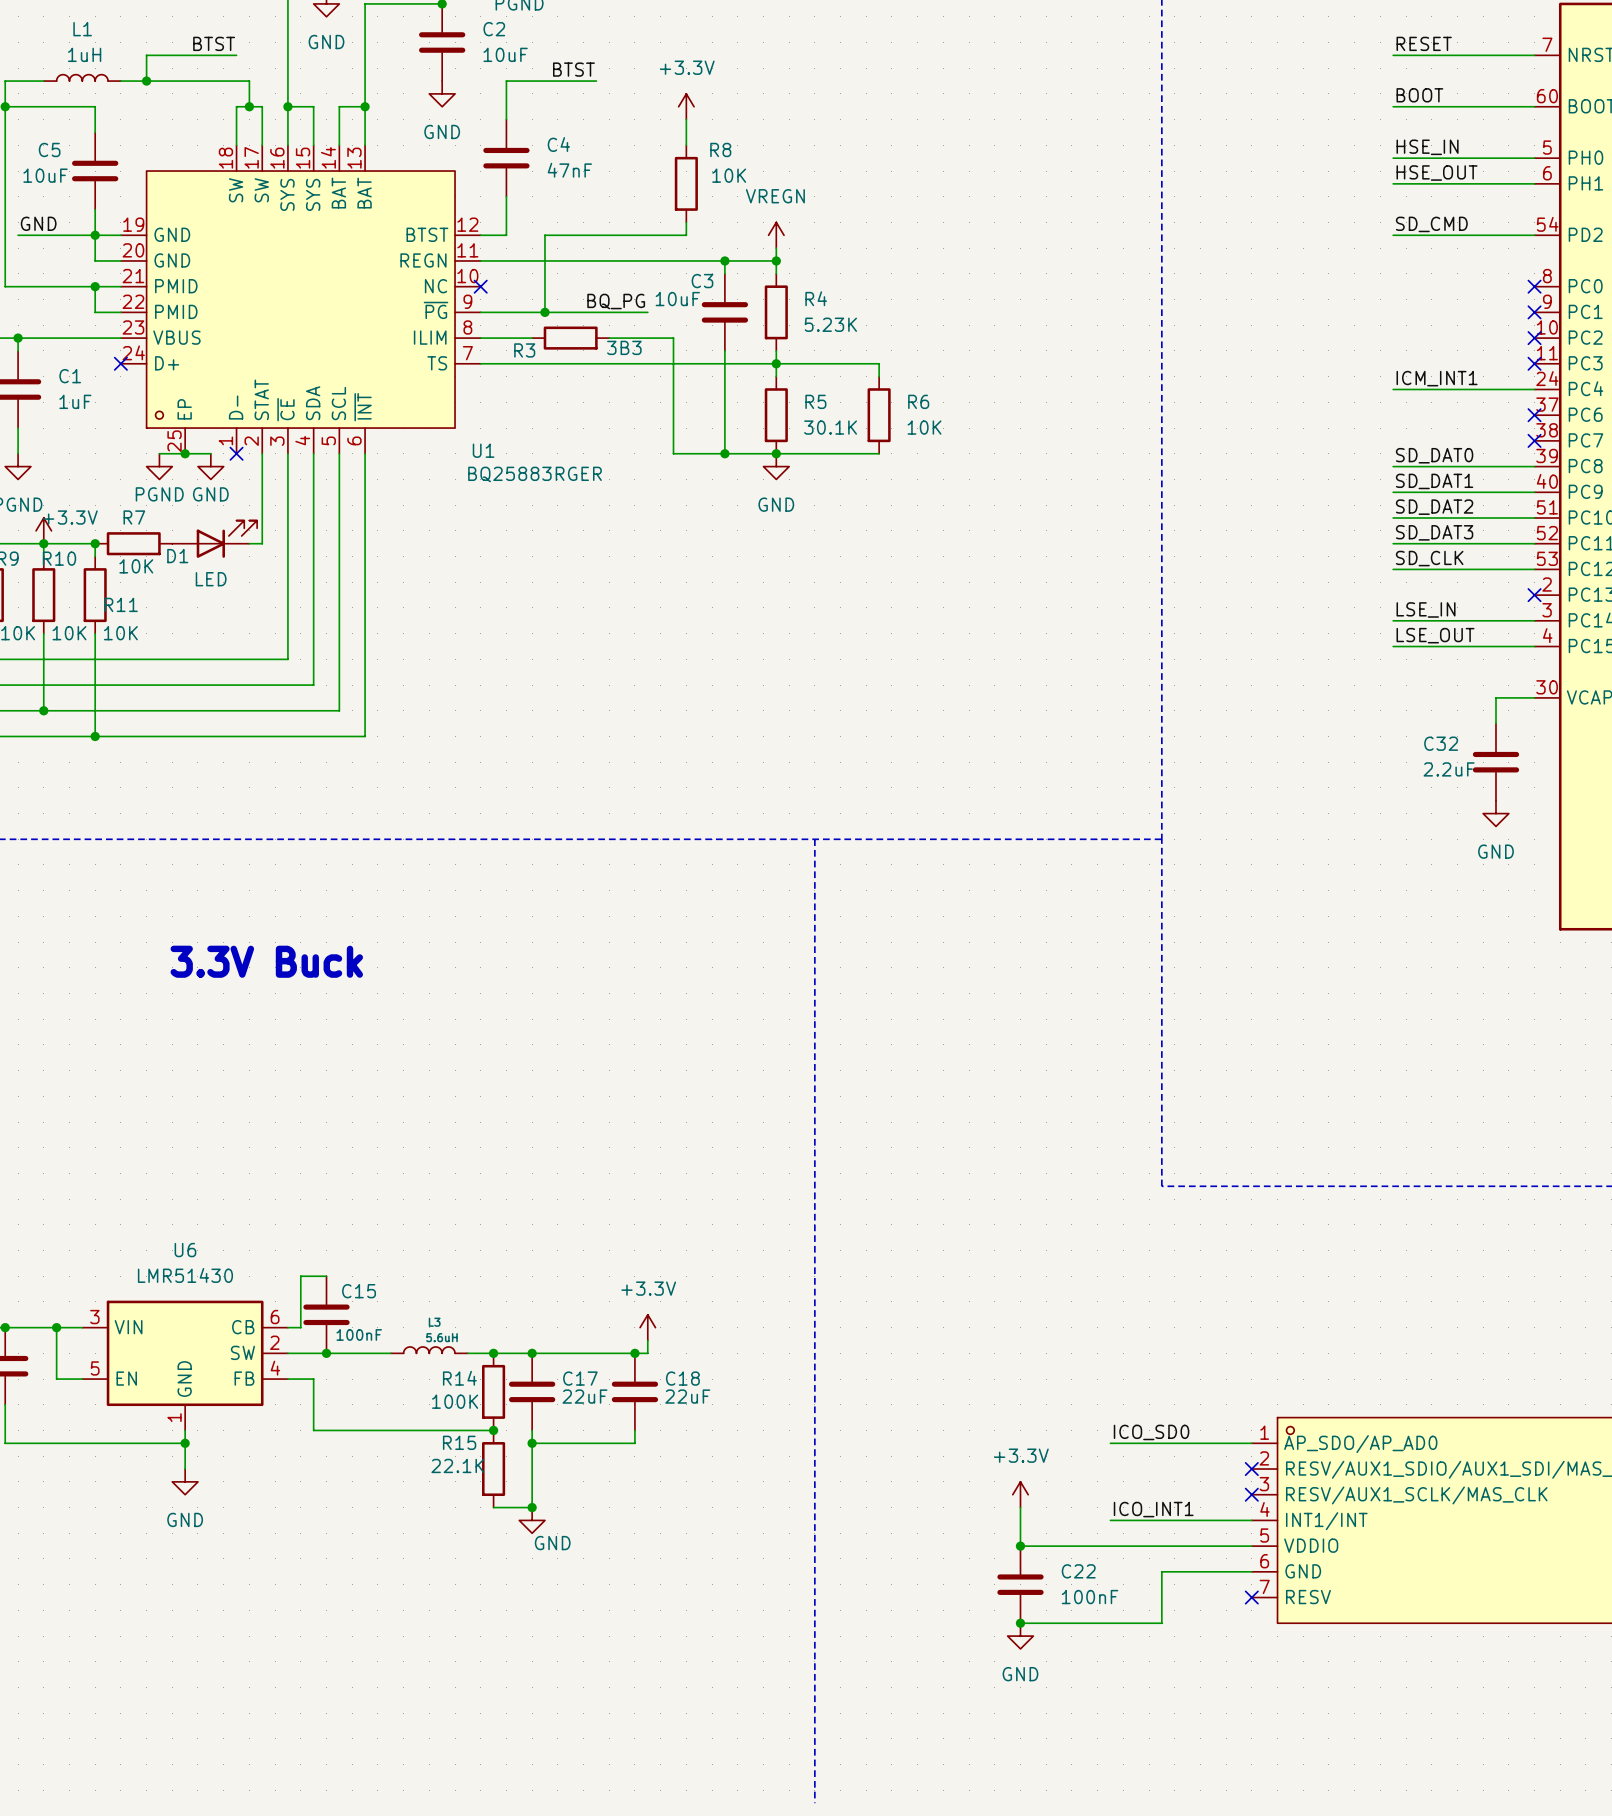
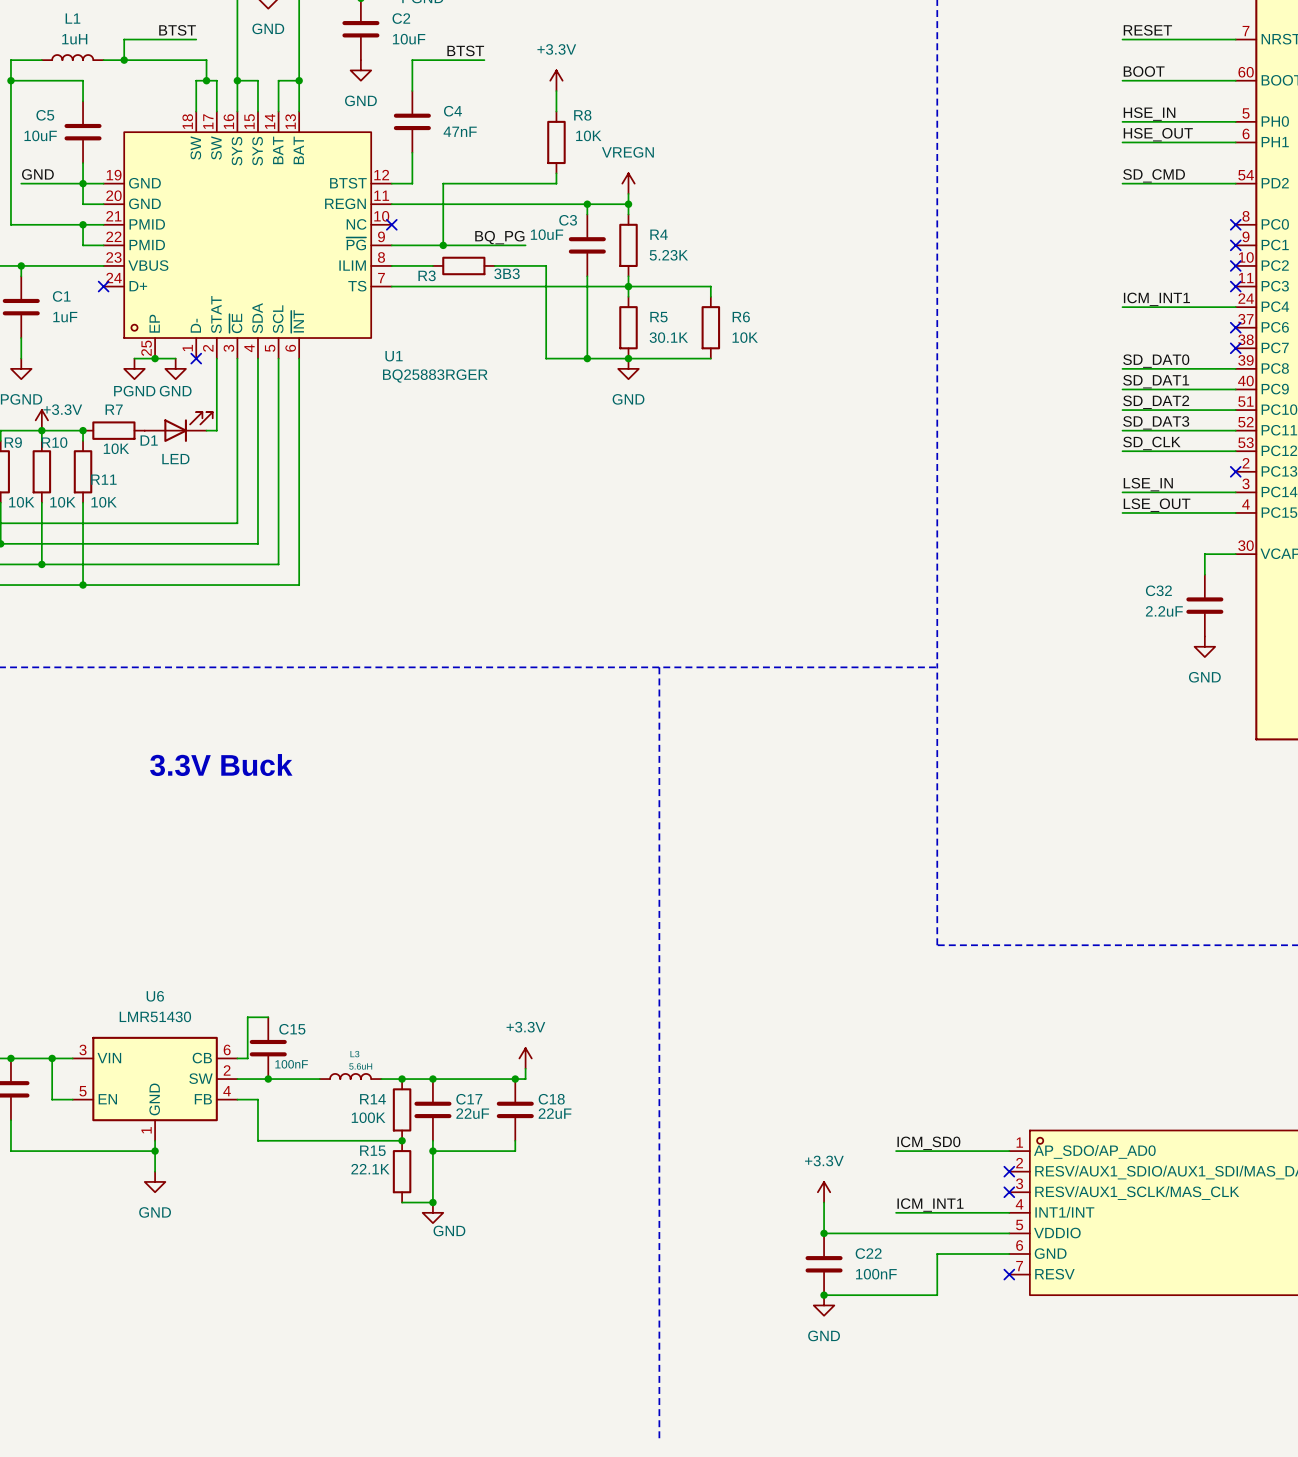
label: ICO_SD0 (1151, 1432) -> ICM_SD0 (928, 1143)
label: ICO_INT1 (1153, 1509) -> ICM_INT1 (930, 1205)

